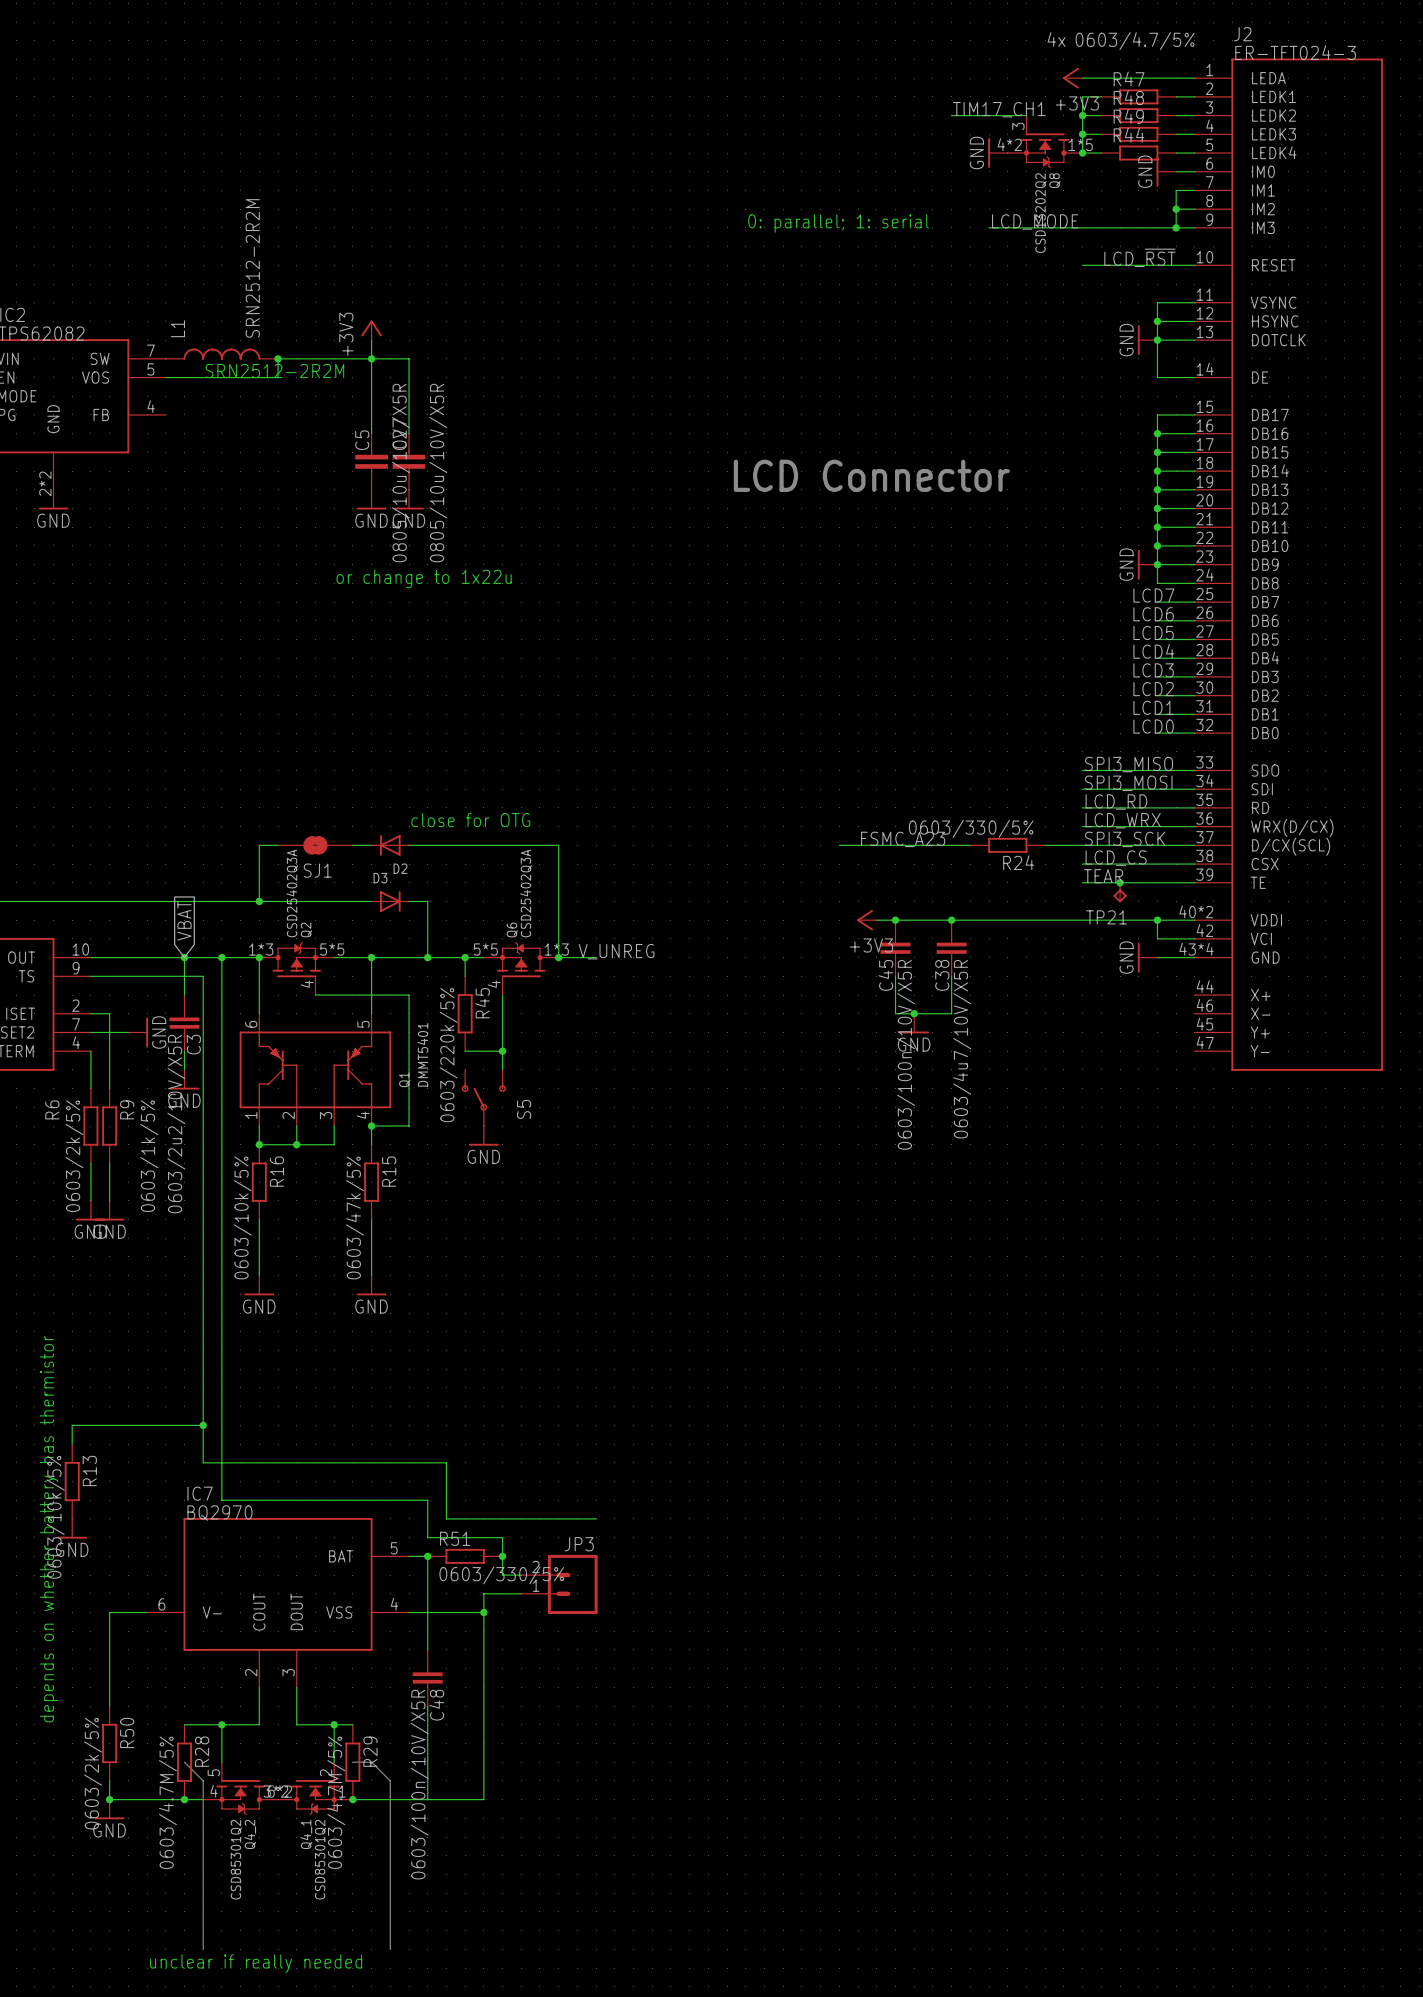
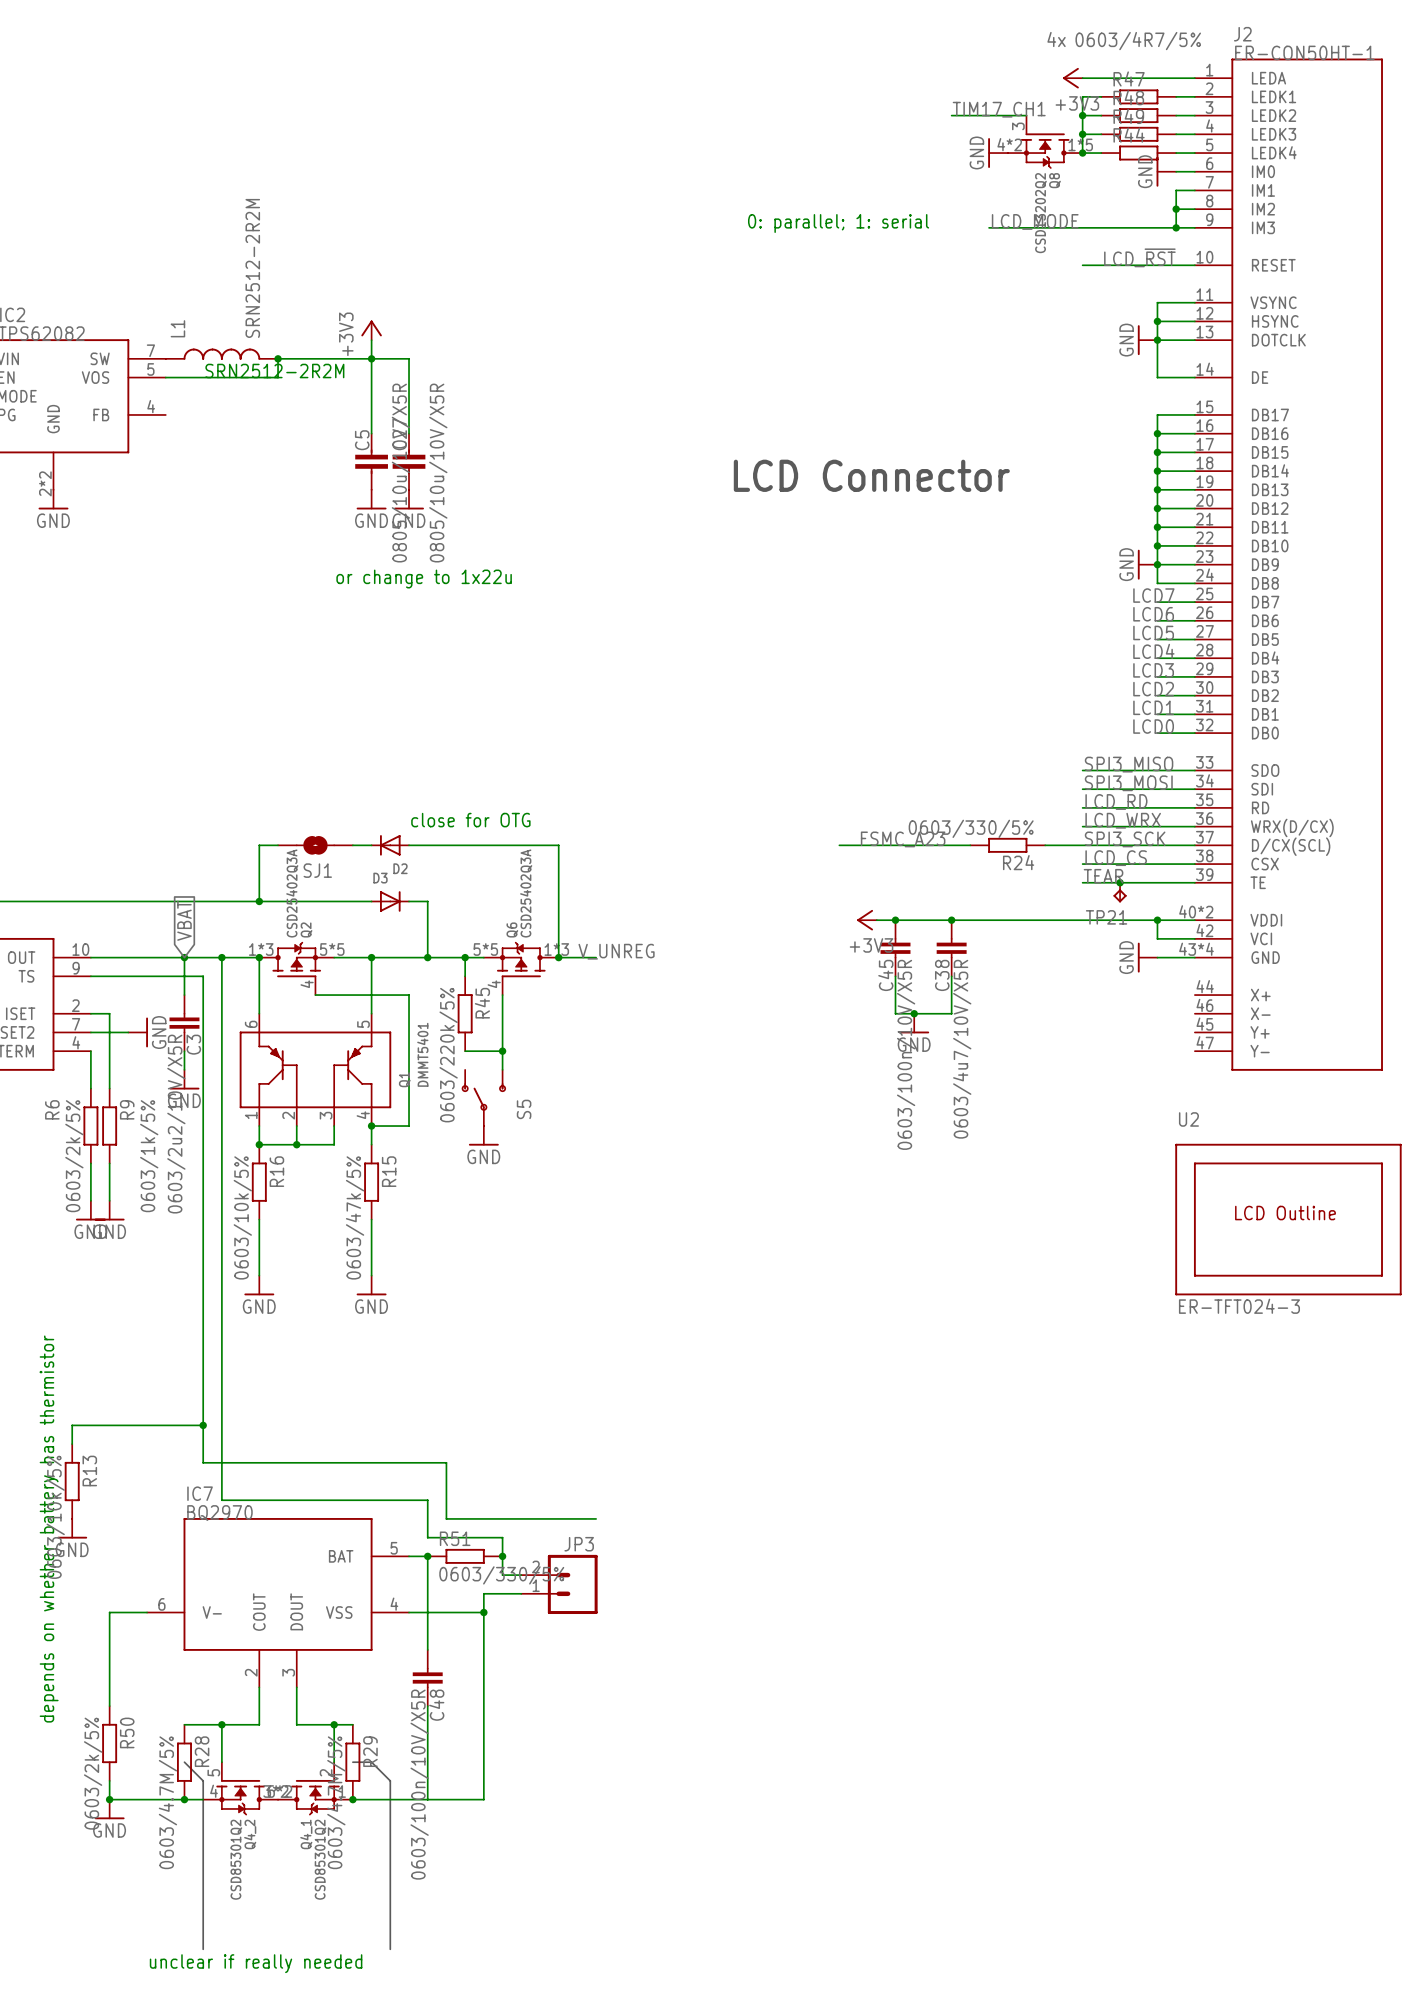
R44 value: 0603/4.7/5% (1135, 41) -> 0603/4R7/5% (1138, 41)
J2 value: ER-TFT024-3 (1295, 52) -> ER-CON50HT-1 (1304, 52)
U2: none -> ER-TFT024-3 (1288, 1219)

